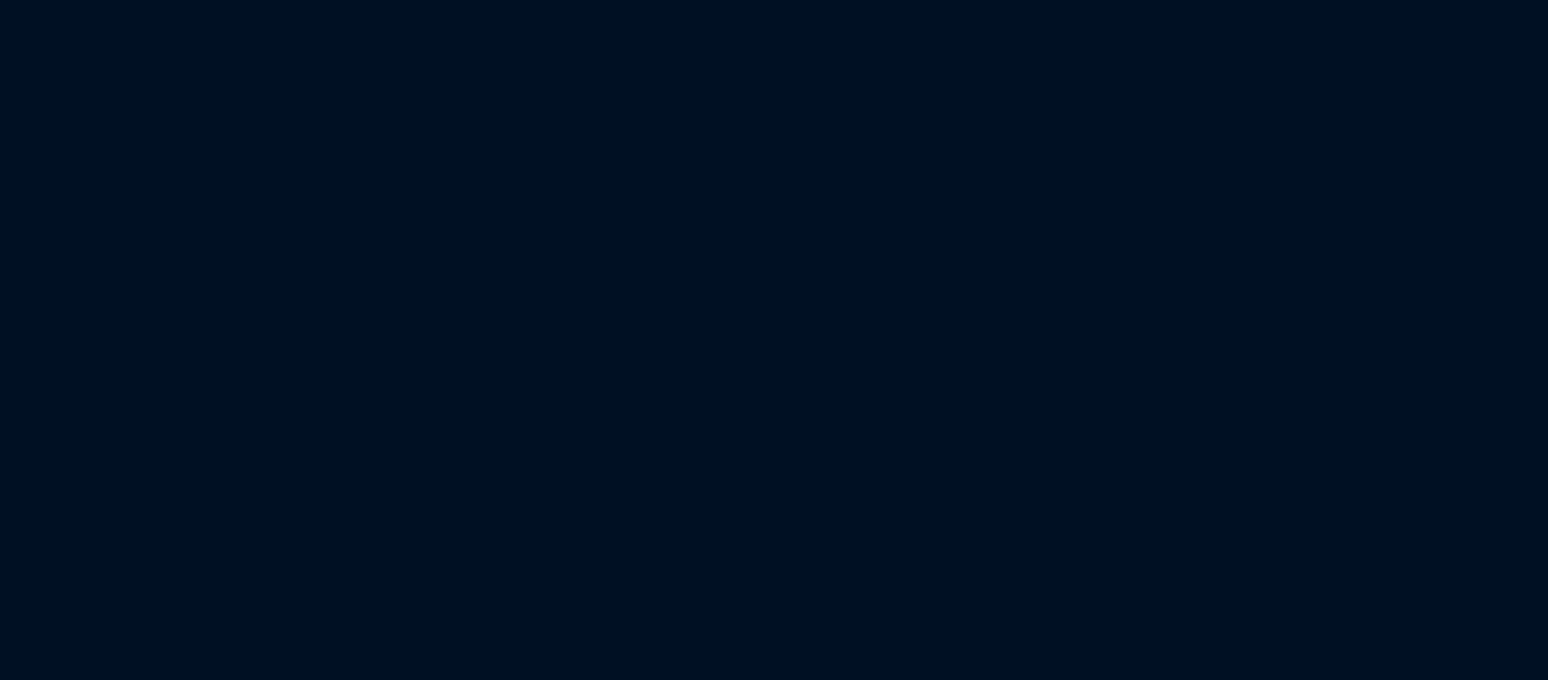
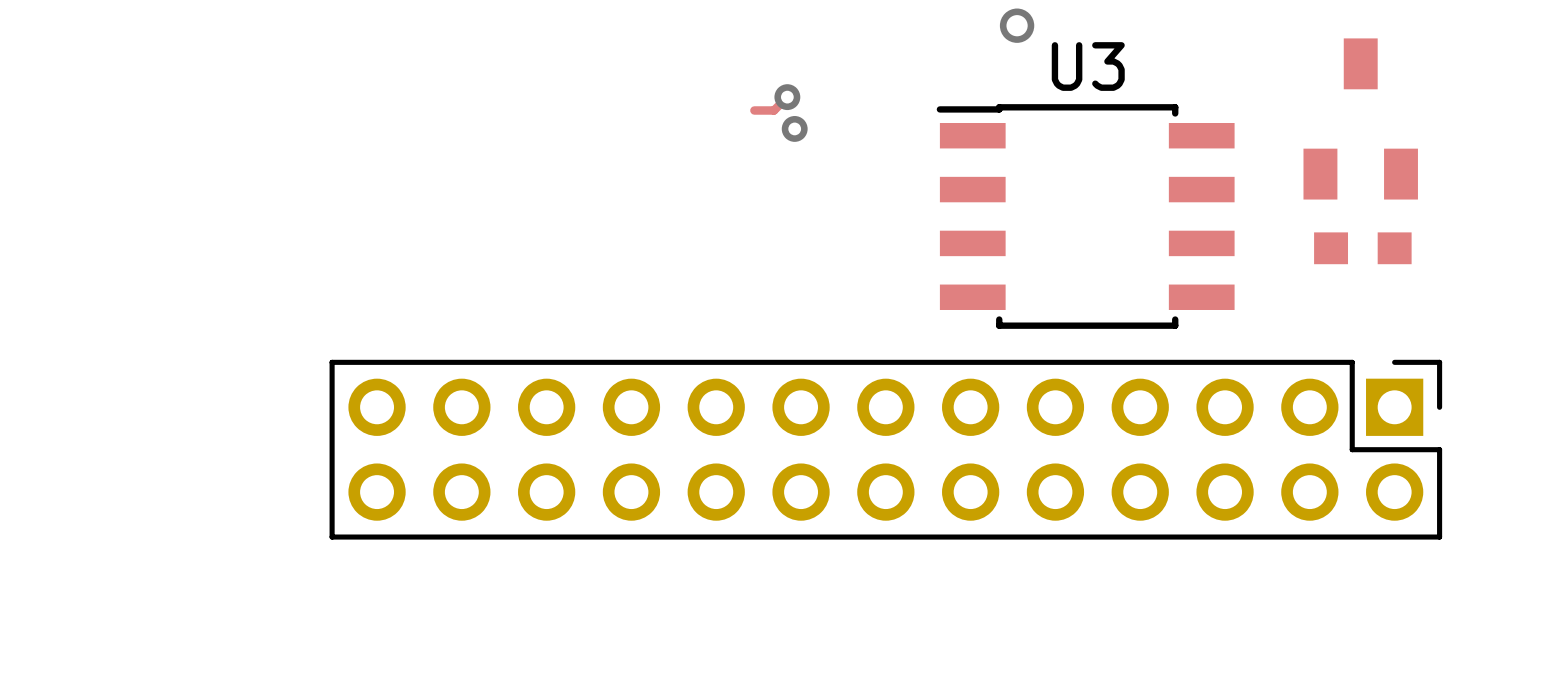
via: none -> (1017, 25)
track: none -> (787, 97) (773, 110) (754, 110)
via: none -> (787, 97)
part: none -> (1360, 118)
via: none -> (794, 128)
U3: none -> (1085, 216)
part: none -> (1362, 248)
part: none -> (885, 449)

